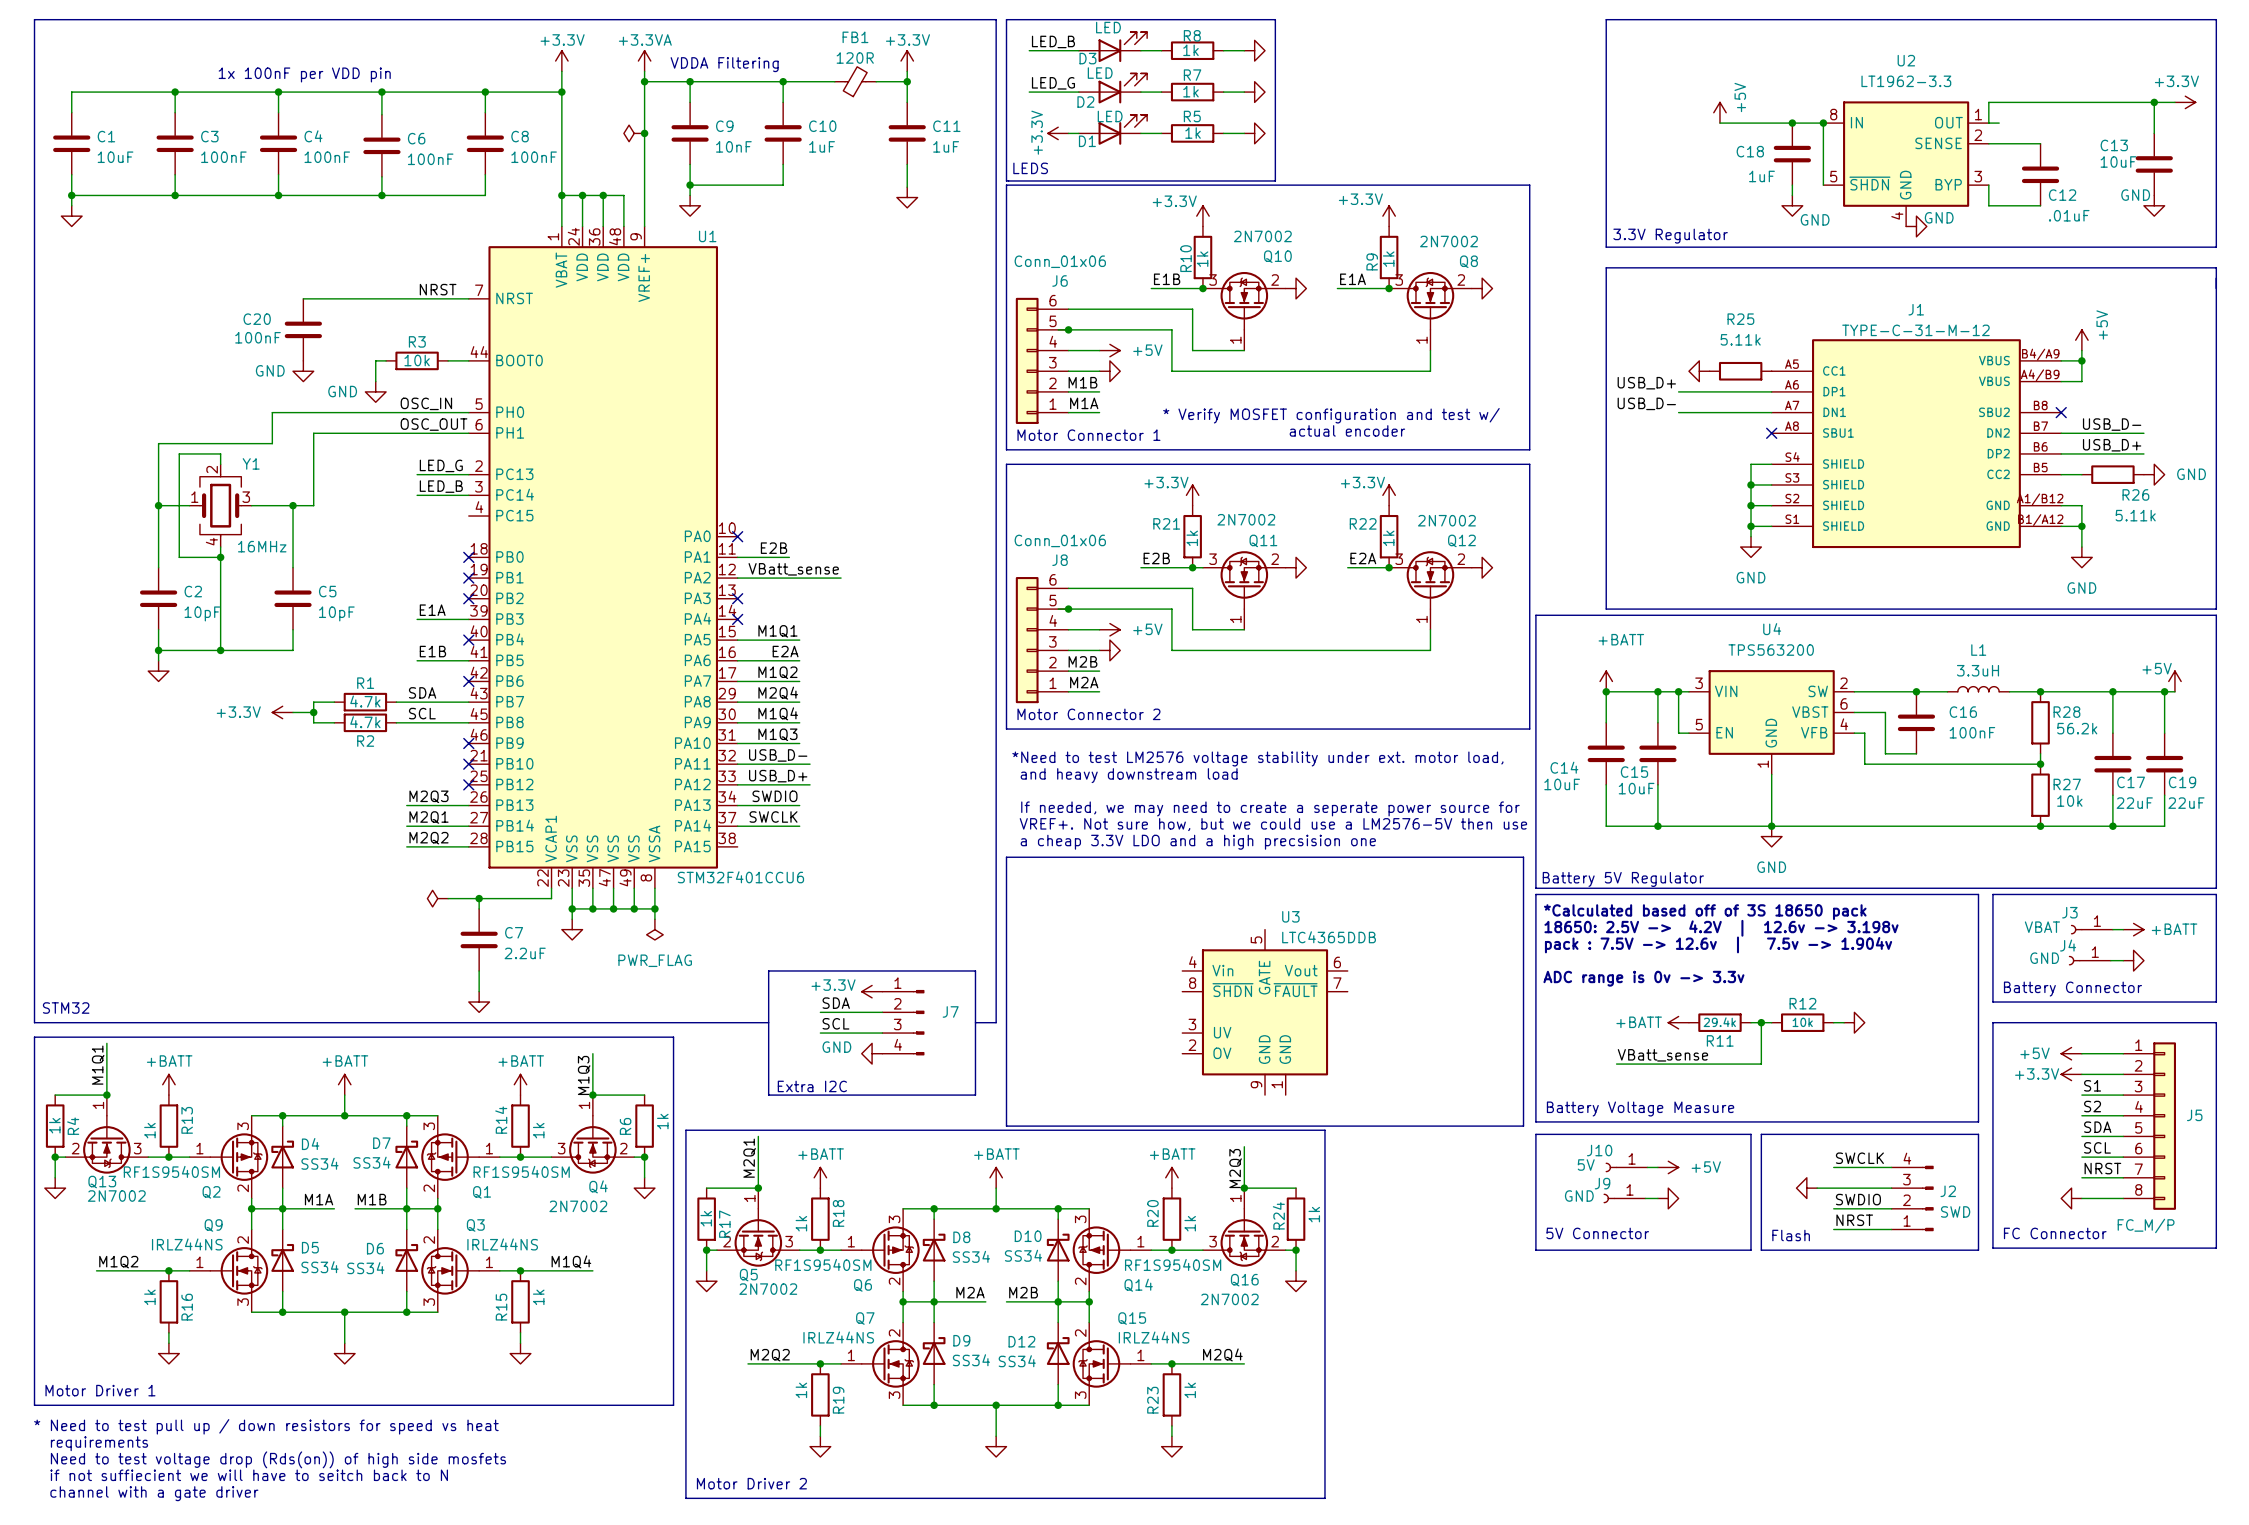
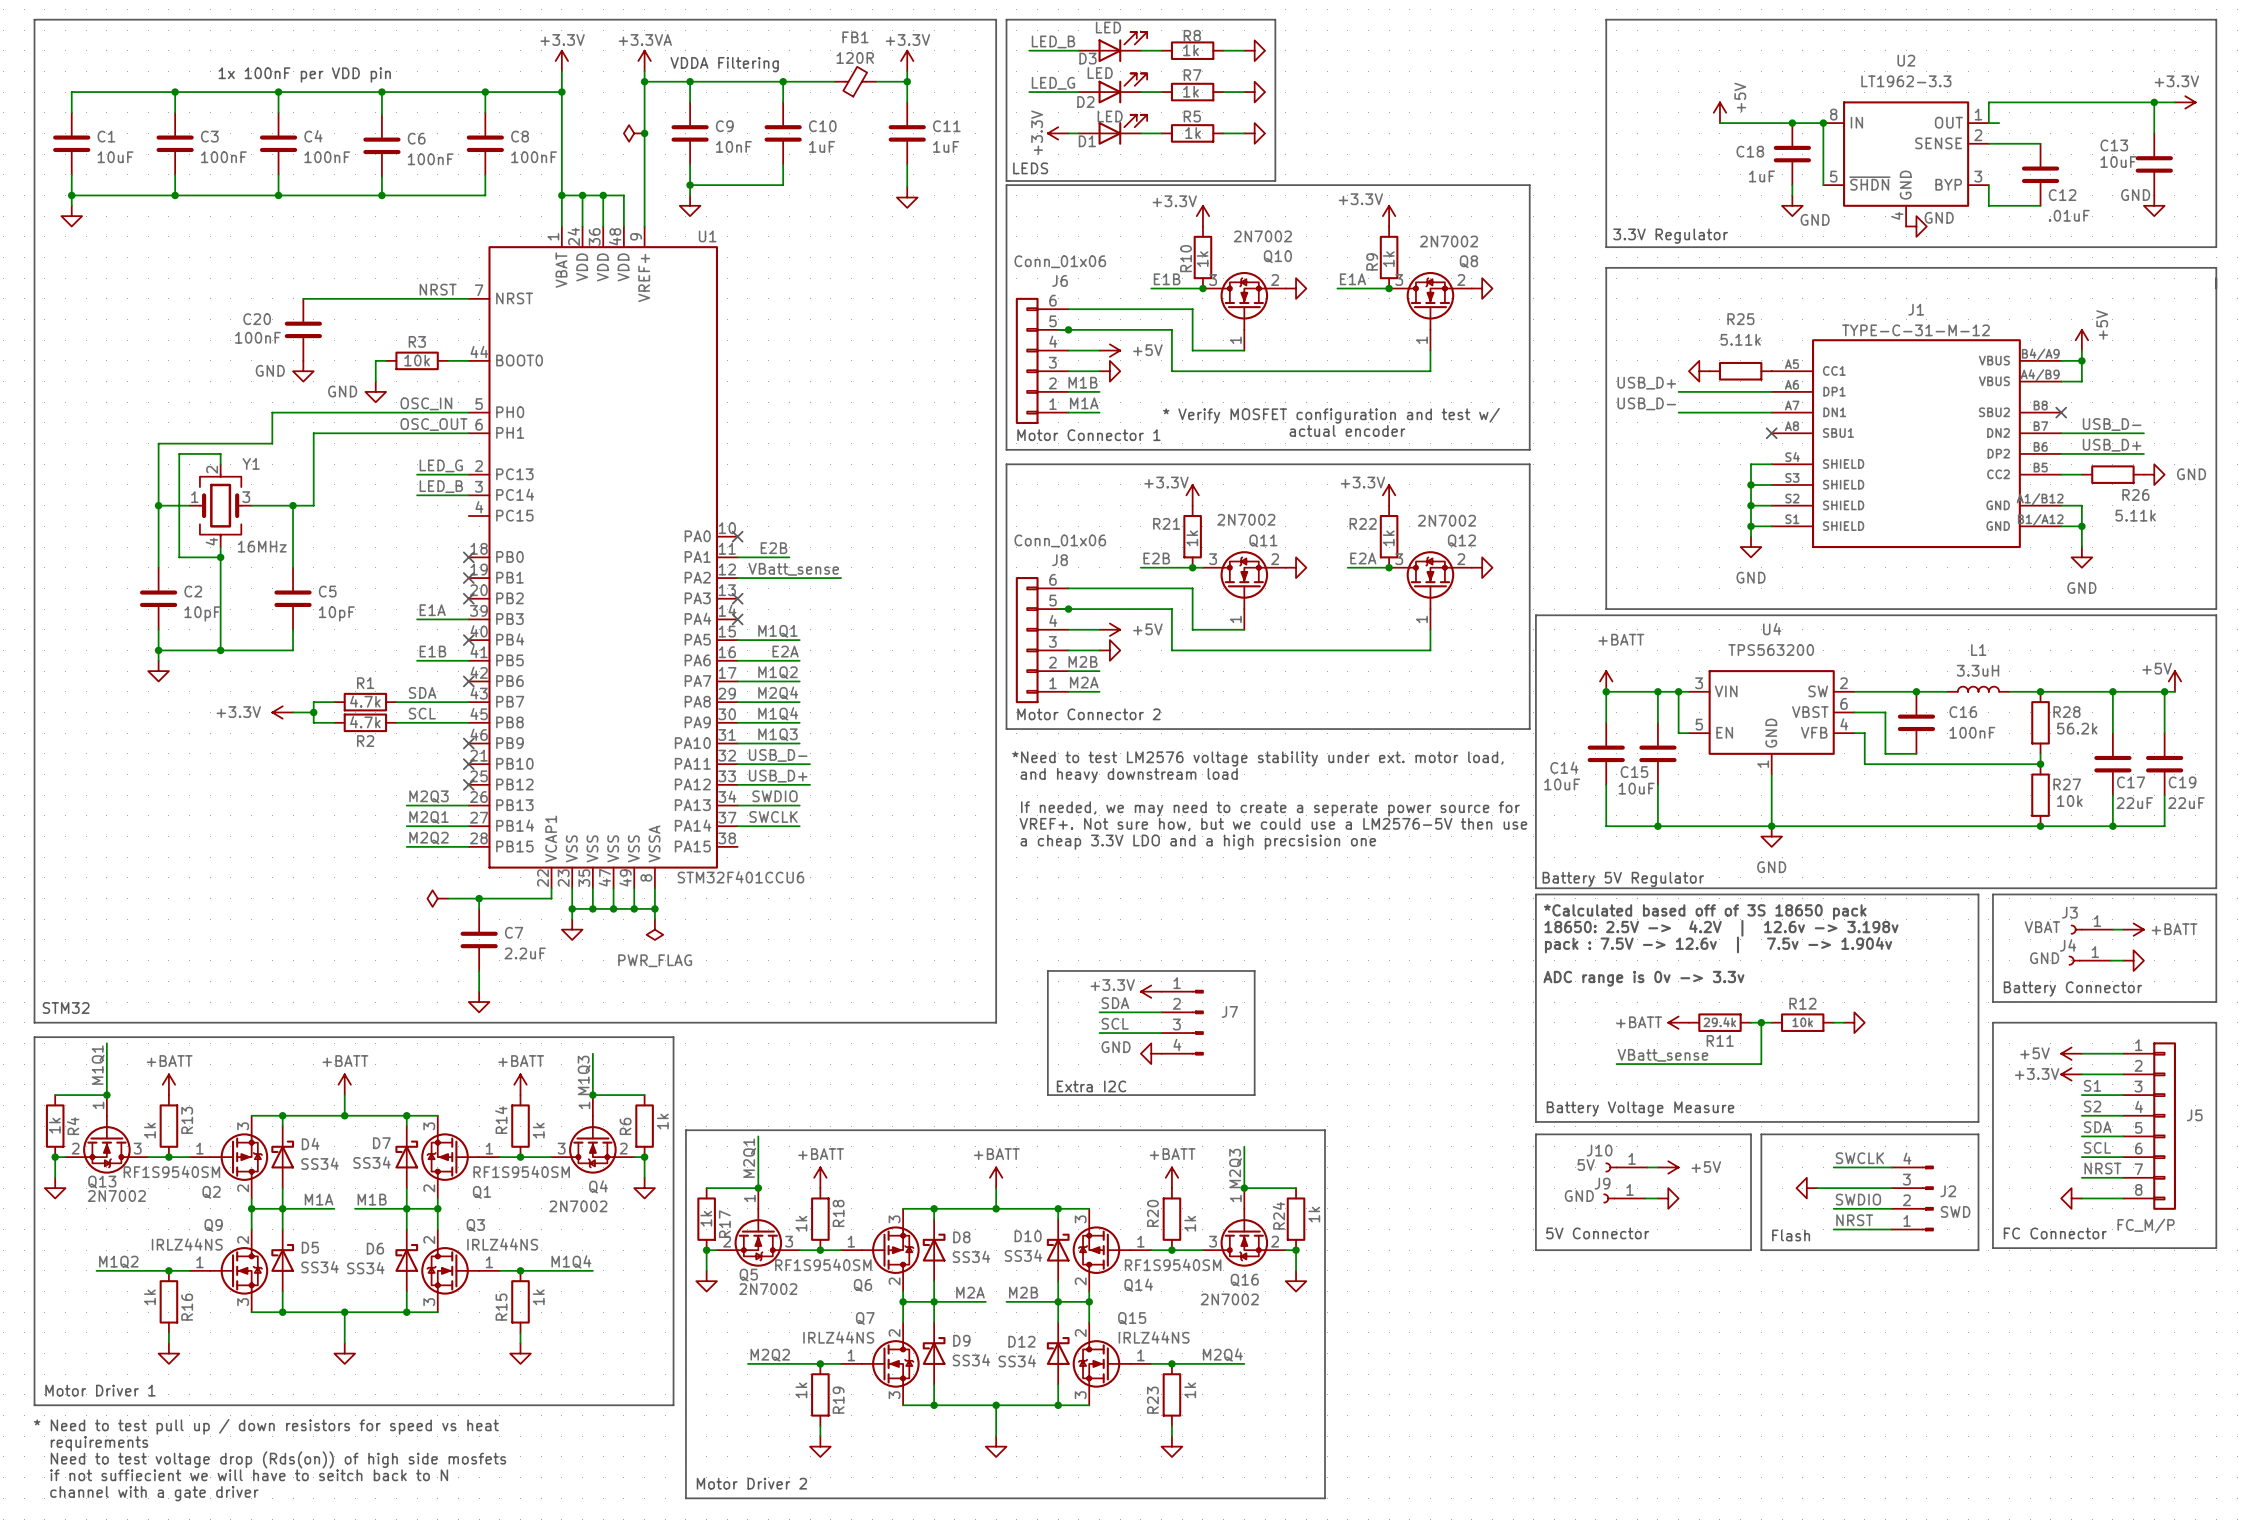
line: (1006, 857) (1523, 857) (1523, 1126) (1006, 1126) (1006, 857) -> none
line: (768, 970) (975, 970) (975, 1095) (768, 1095) (768, 970) -> none
line: none -> (1047, 970) (1254, 970) (1254, 1095) (1047, 1095) (1047, 970)
power symbol: +3.3V (872, 991) -> none
power symbol: none -> +3.3V (1151, 991)
label: SDA (836, 1003) -> none
label: none -> SDA (1115, 1003)
wire: (820, 1012) (882, 1012) -> none
wire: none -> (1099, 1012) (1161, 1012)
U3: LTC4365DDB (1265, 1012) -> none
line: none -> (768, 1022) (975, 1022)
J7 position: (903, 1022) -> (1182, 1022)
label: SCL (835, 1023) -> none
label: none -> SCL (1115, 1023)
wire: (820, 1033) (882, 1033) -> none
wire: none -> (1099, 1033) (1161, 1033)
power symbol: GND (872, 1053) -> none
power symbol: none -> GND (1151, 1053)
text: Extra I2C (812, 1086) -> none
text: none -> Extra I2C (1091, 1086)

